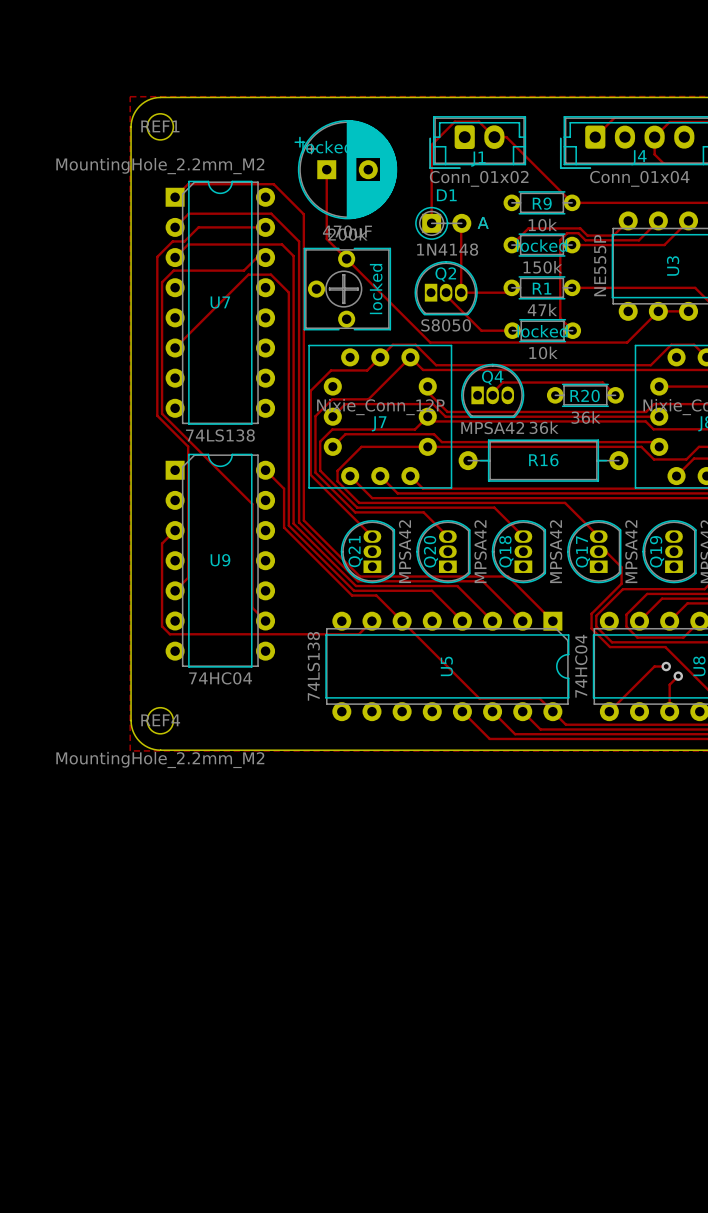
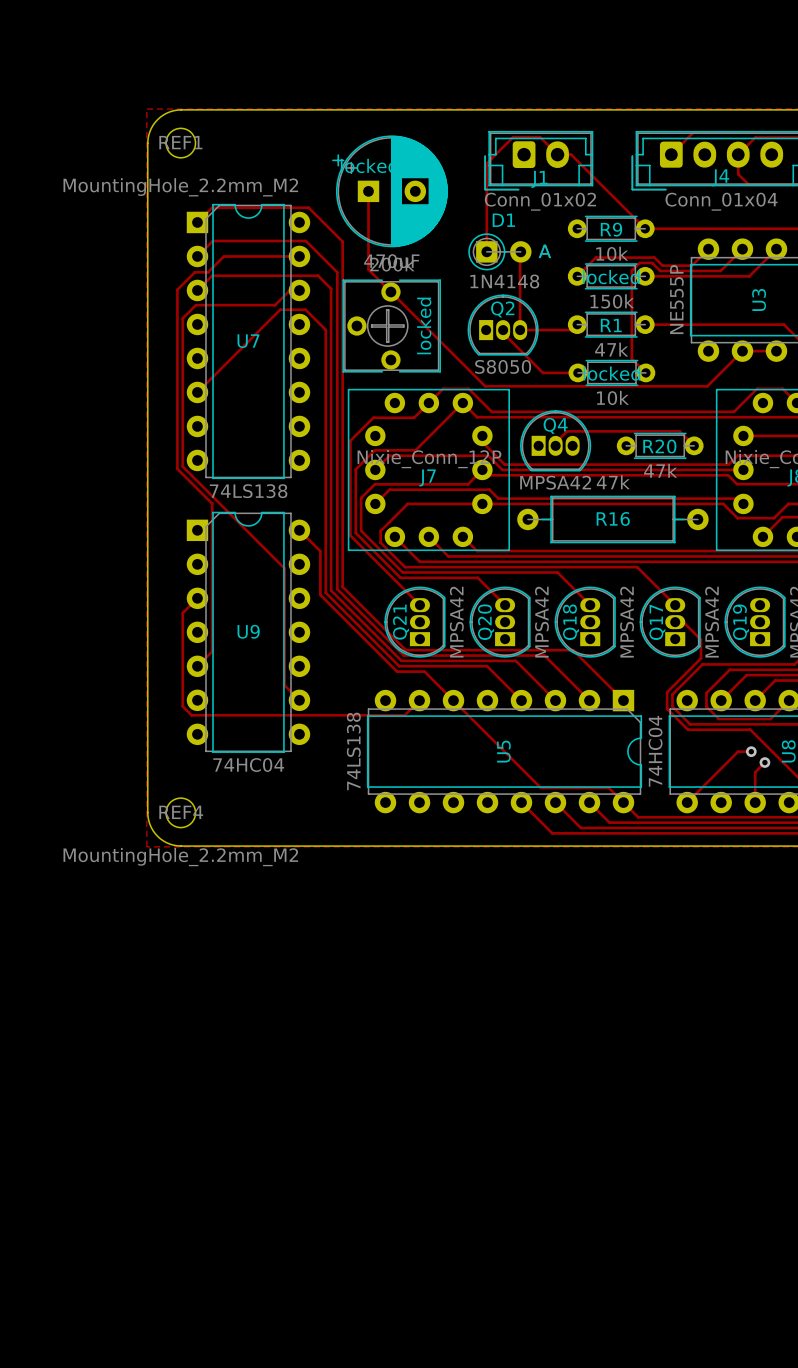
R20 value: 36k (586, 417) -> 47k (660, 470)
R16 value: 36k (544, 427) -> 47k (613, 482)

